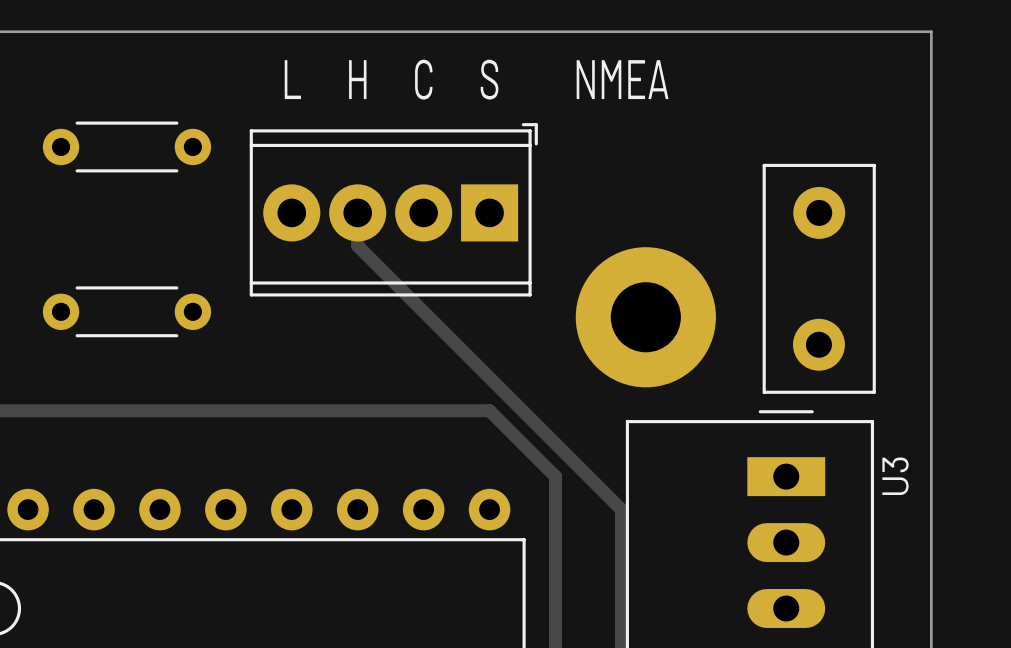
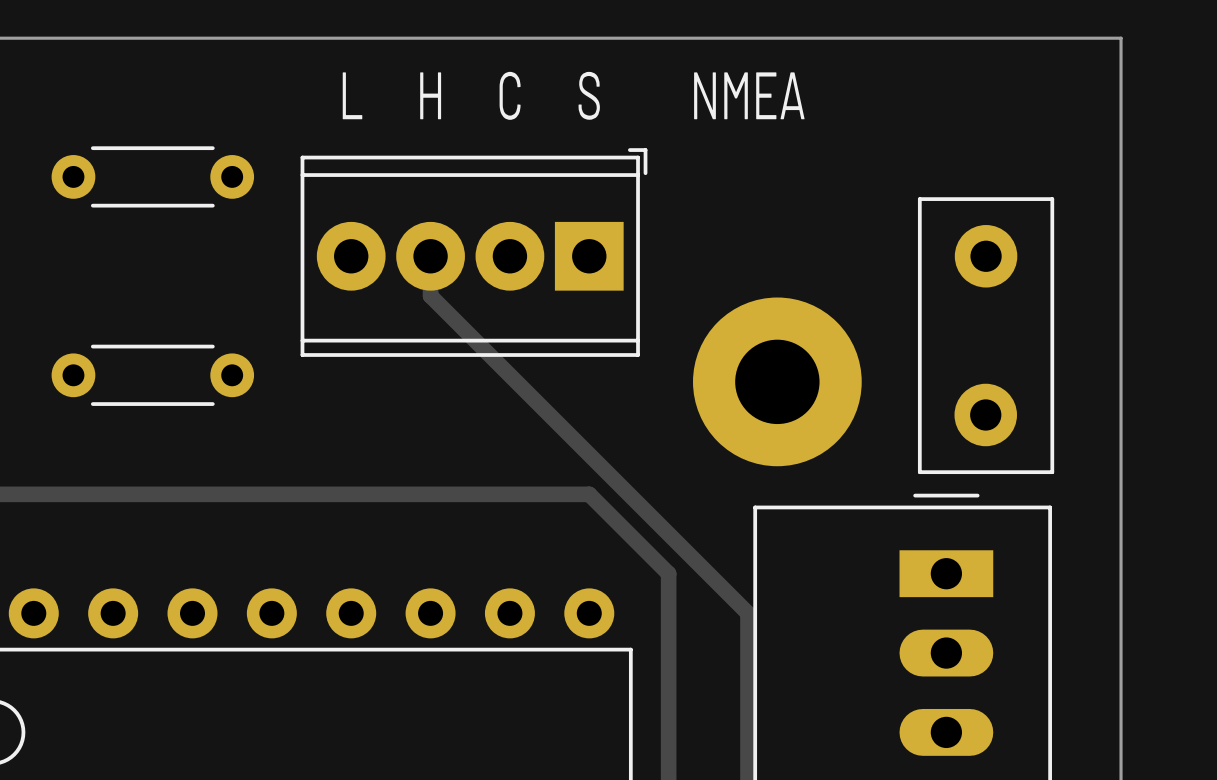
U3 name: U3 (895, 476) -> none

